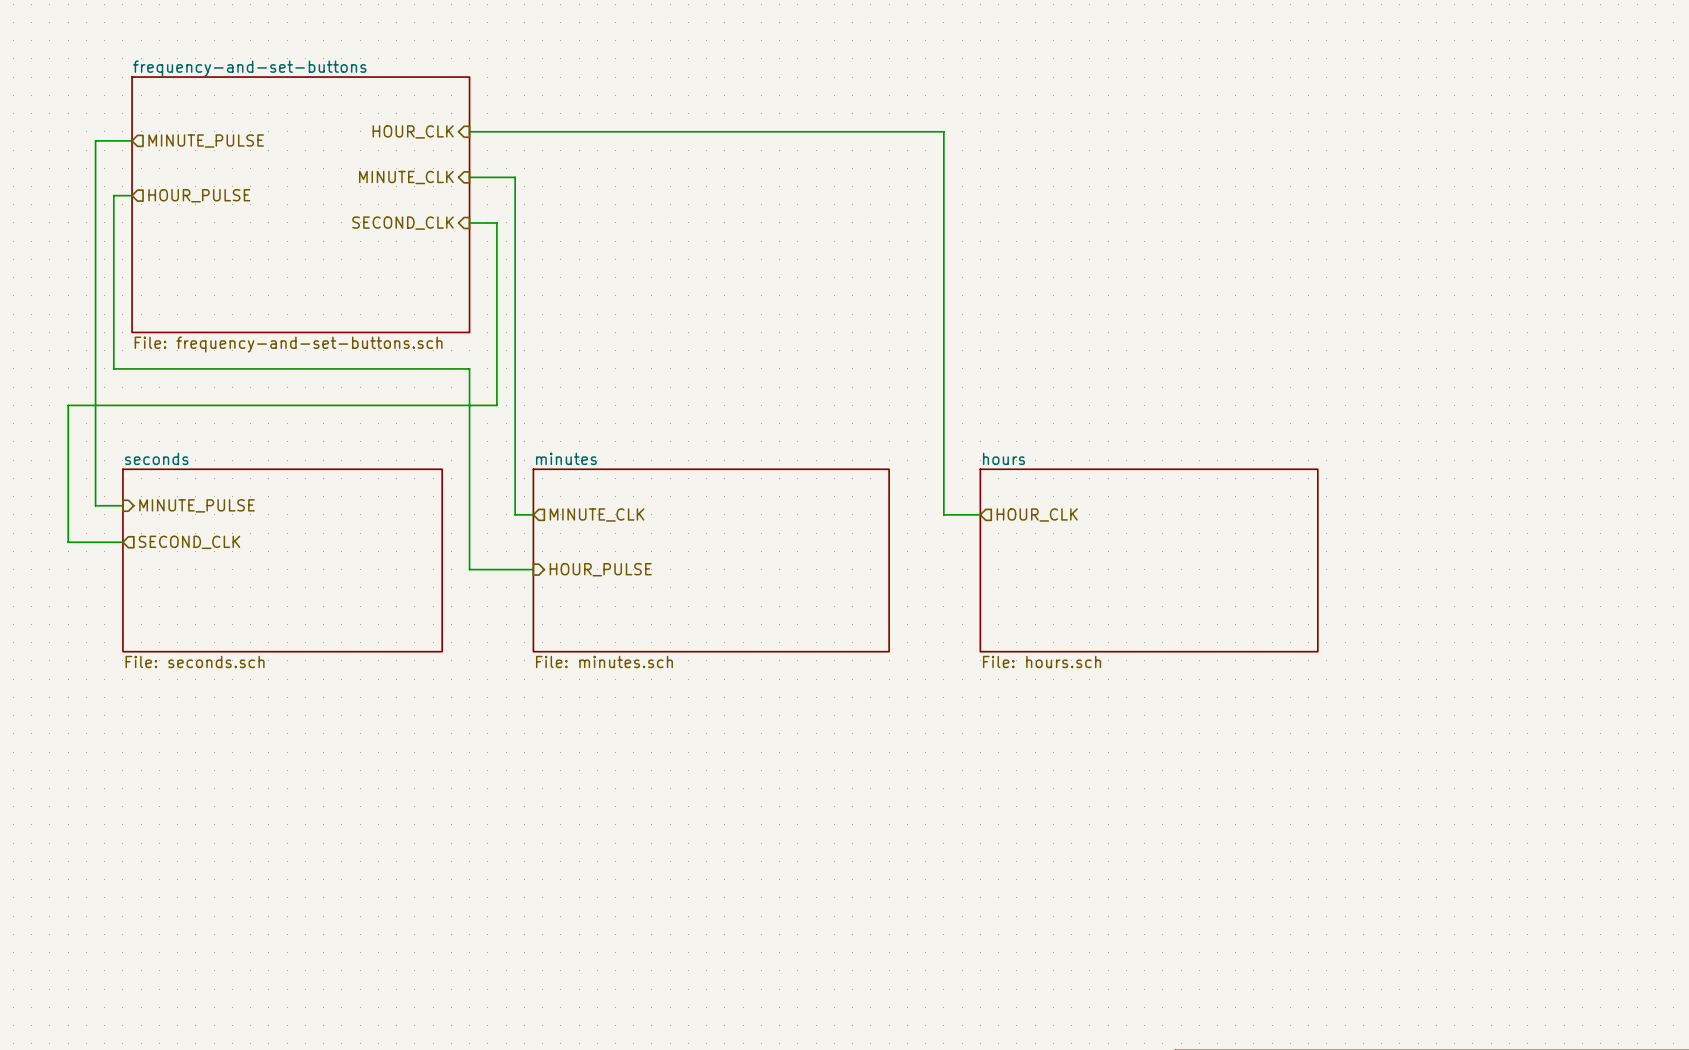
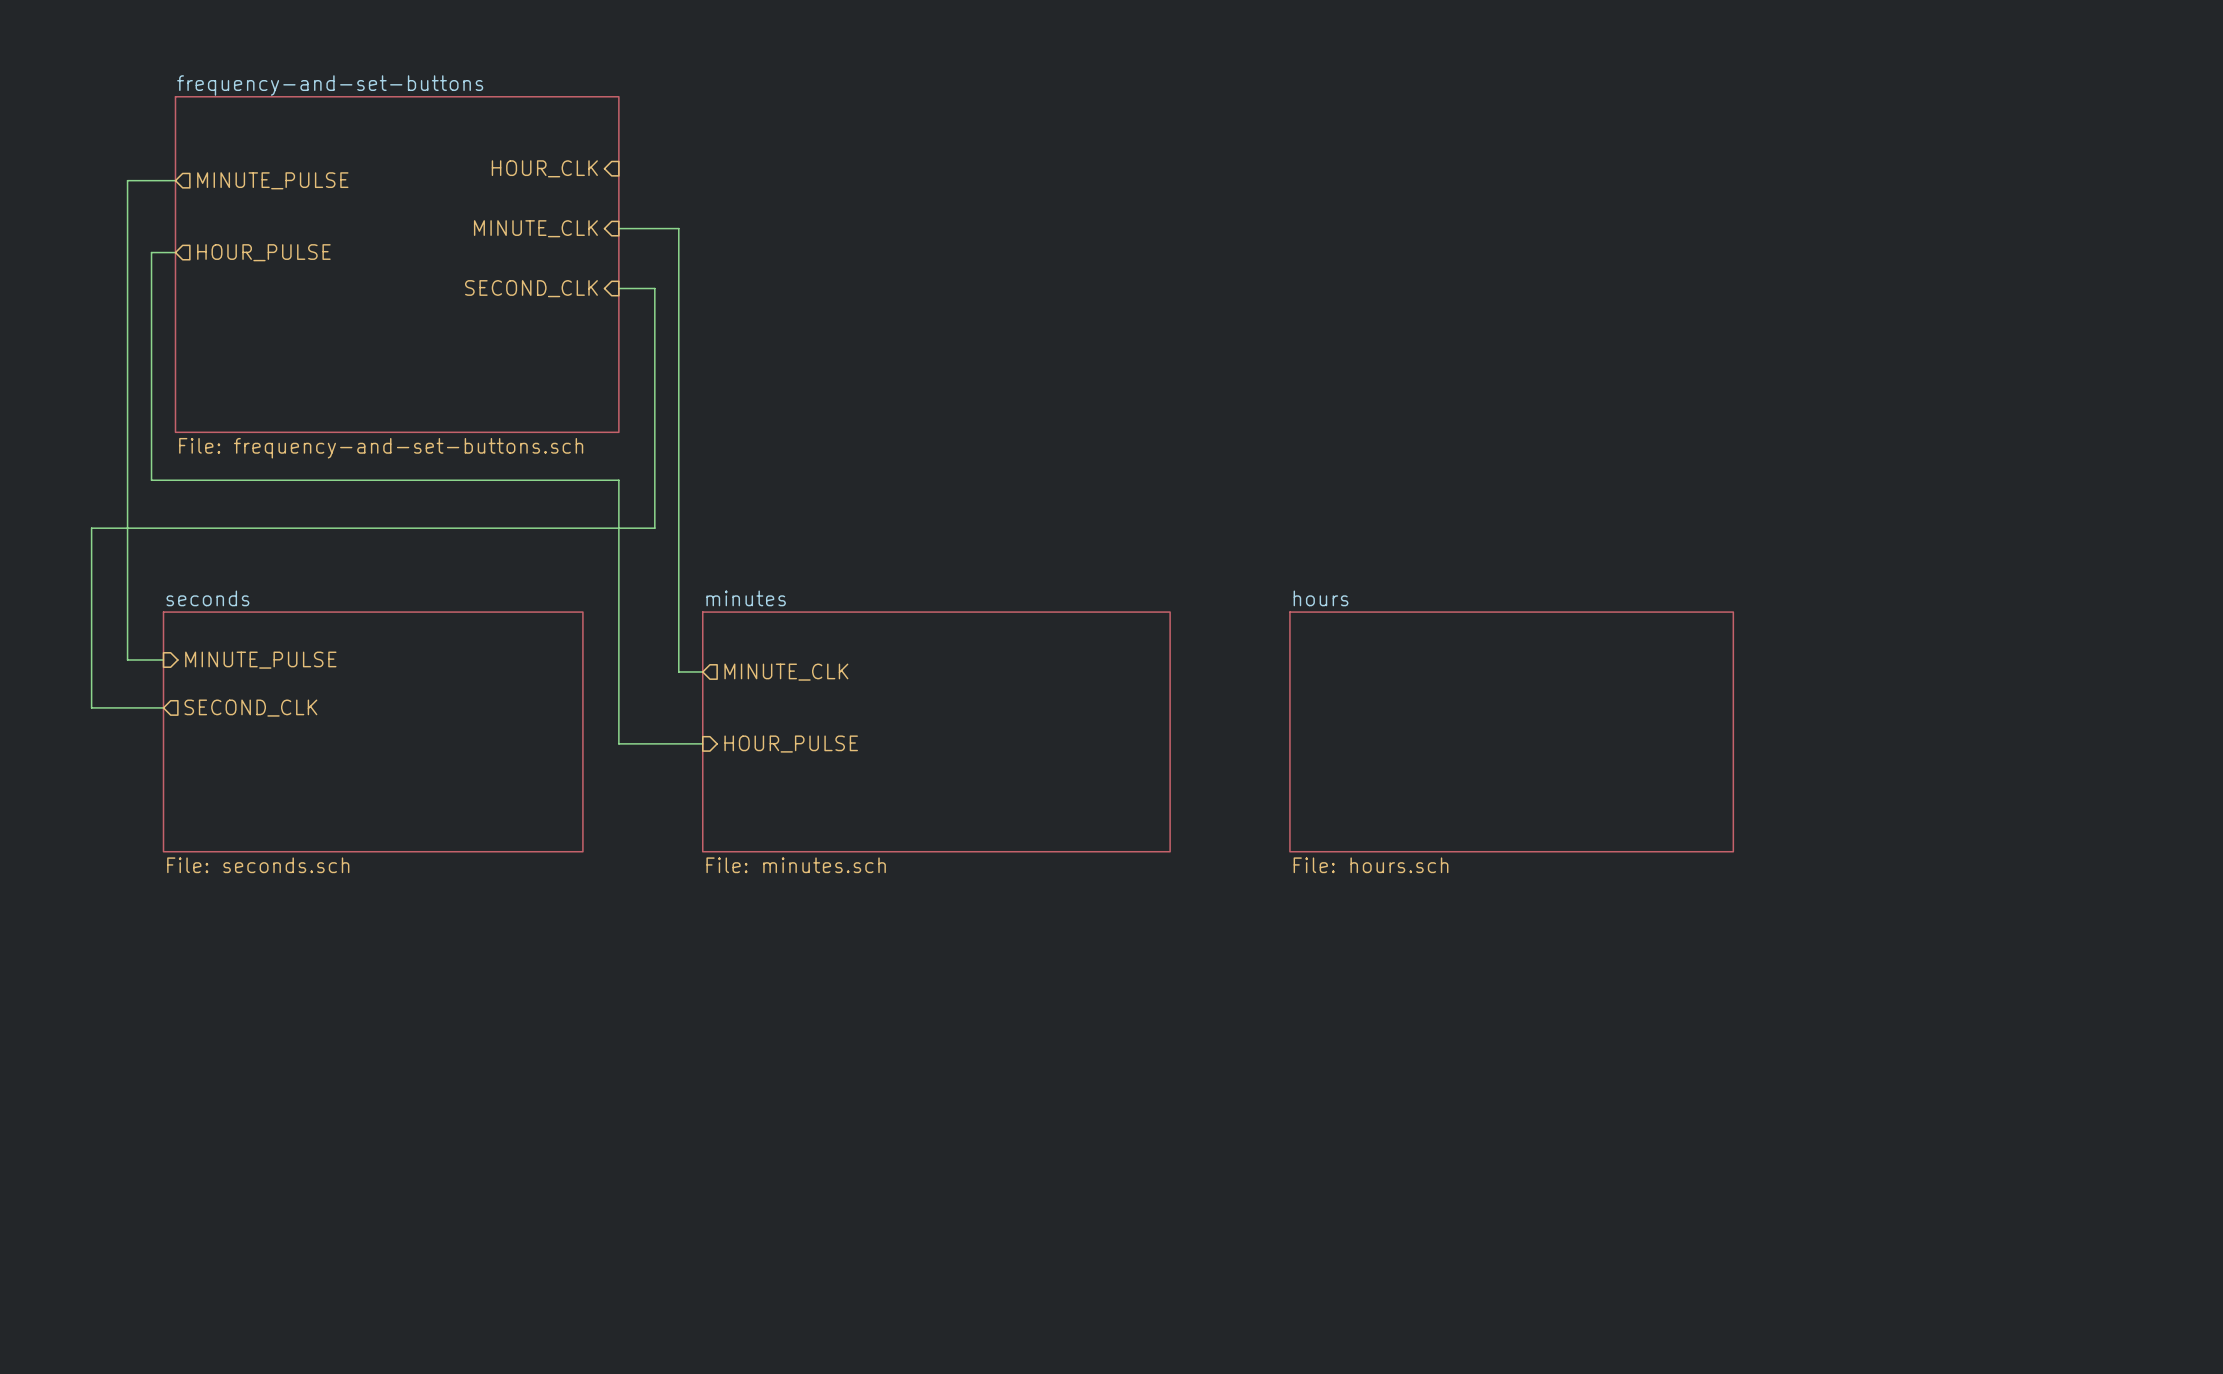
wire: (469, 131) (943, 131) (943, 514) (980, 514) -> none
hierarchical label: HOUR_CLK (1037, 514) -> none

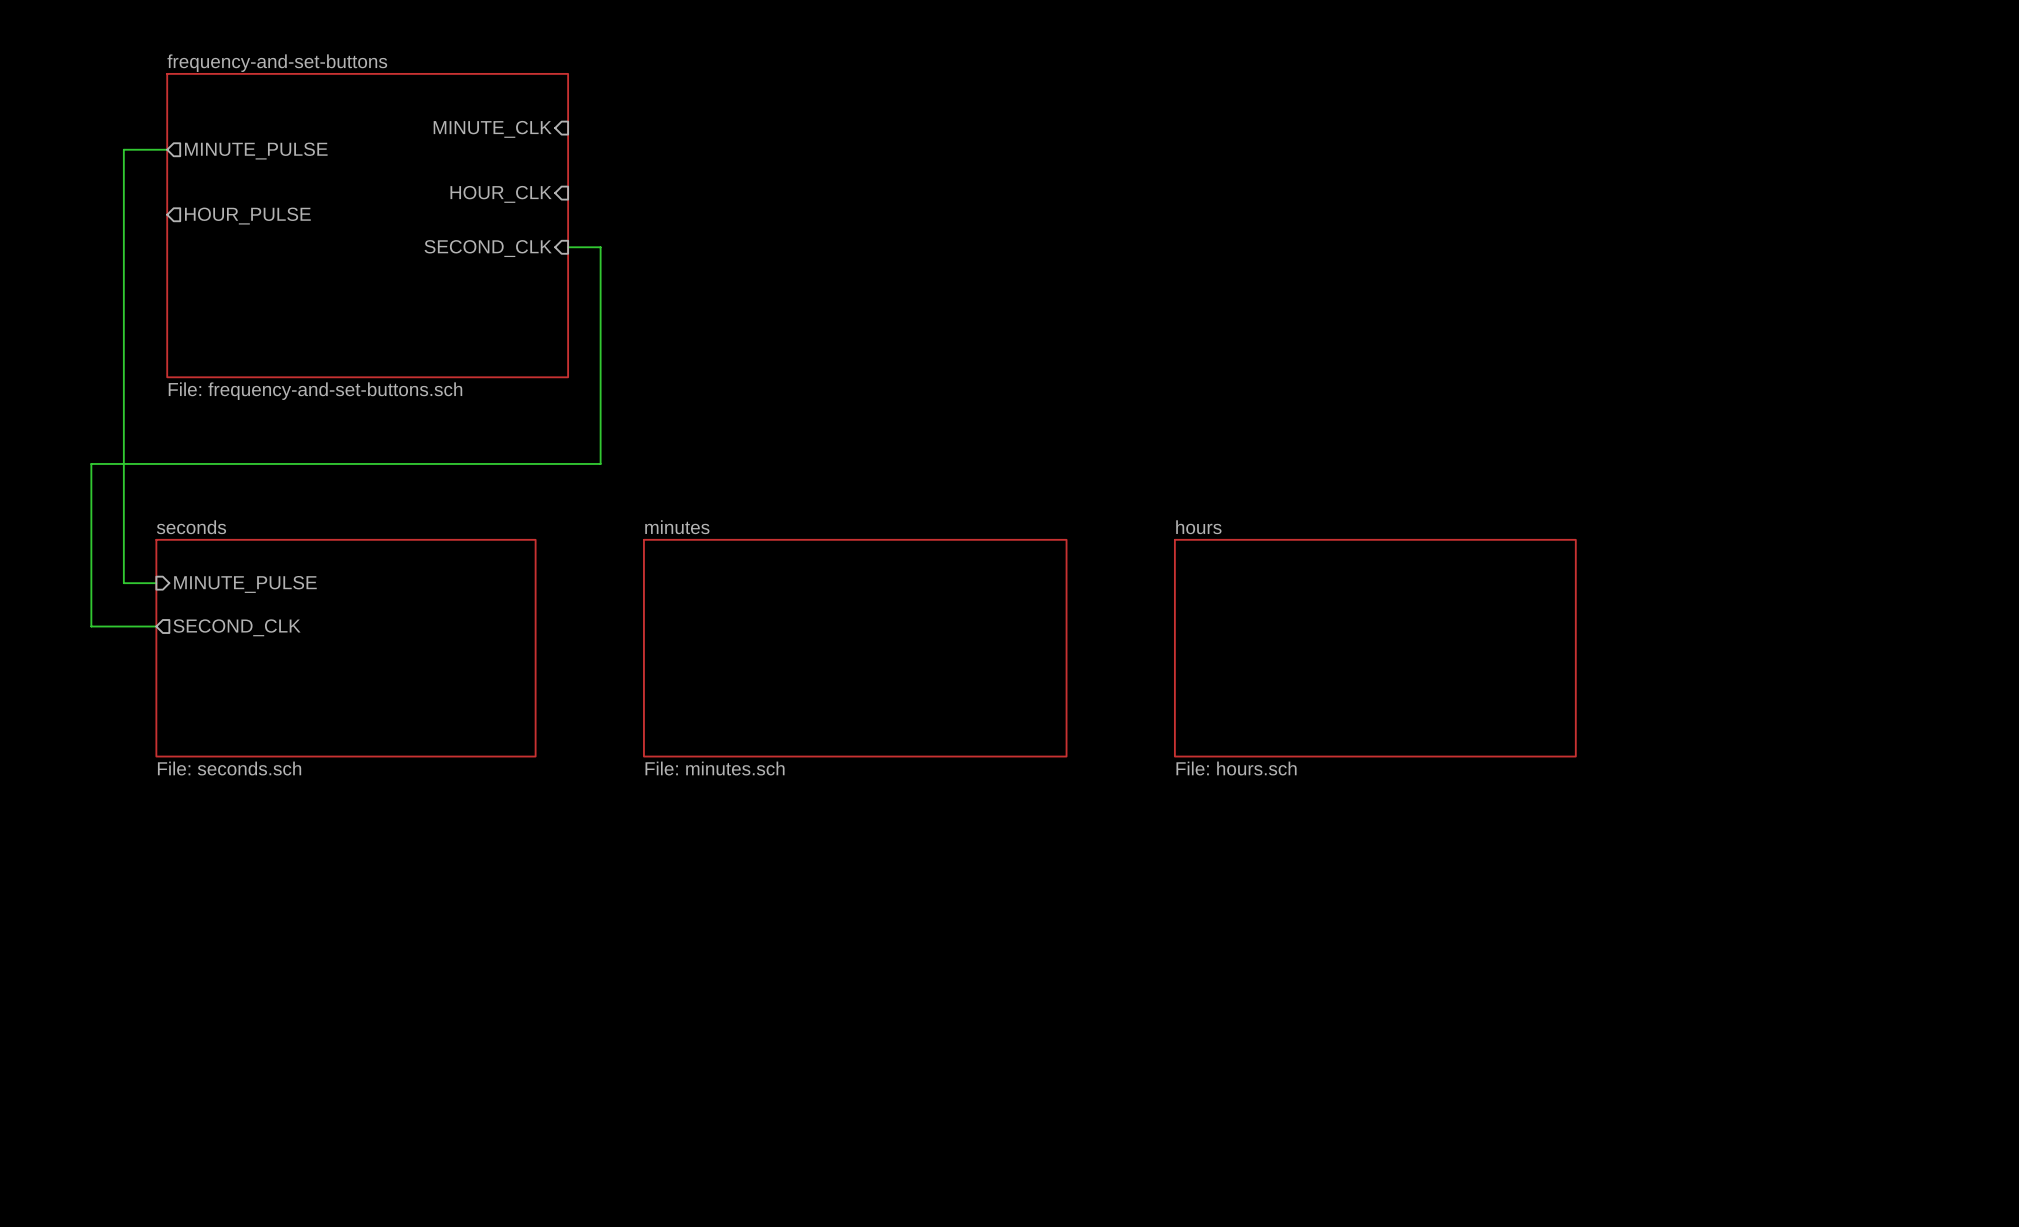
hierarchical label: none -> MINUTE_CLK (492, 129)
hierarchical label: HOUR_CLK (544, 168) -> none
hierarchical label: MINUTE_CLK (535, 228) -> HOUR_CLK (501, 194)
wire: (618, 228) (678, 228) (678, 671) (702, 671) -> none
wire: (175, 252) (151, 252) (151, 480) (618, 480) (618, 743) (702, 743) -> none
hierarchical label: MINUTE_CLK (786, 672) -> none
hierarchical label: HOUR_PULSE (791, 744) -> none

